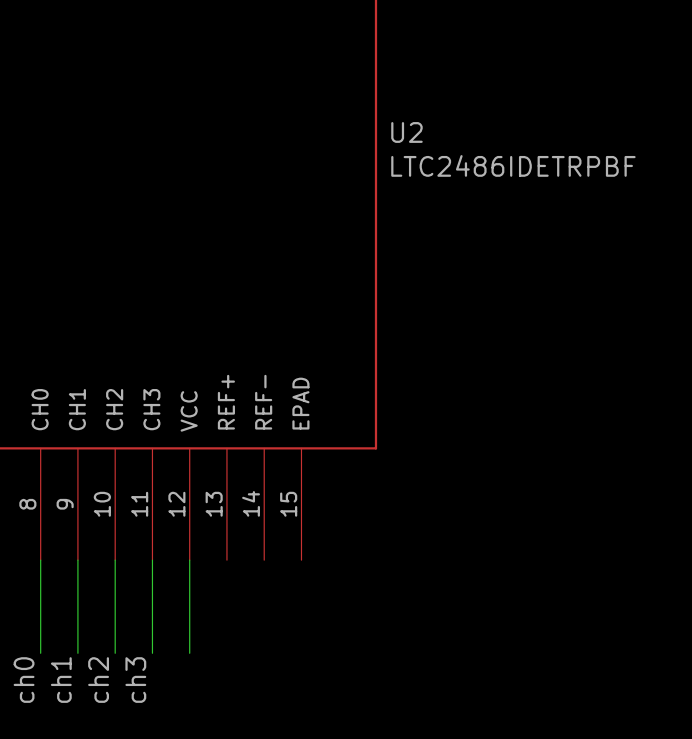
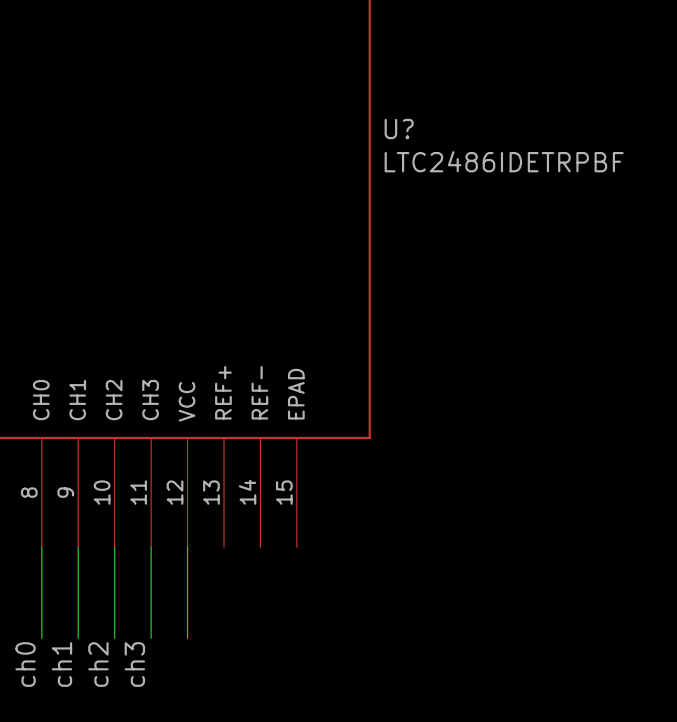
U2 name: U2 (406, 132) -> U? (399, 129)

